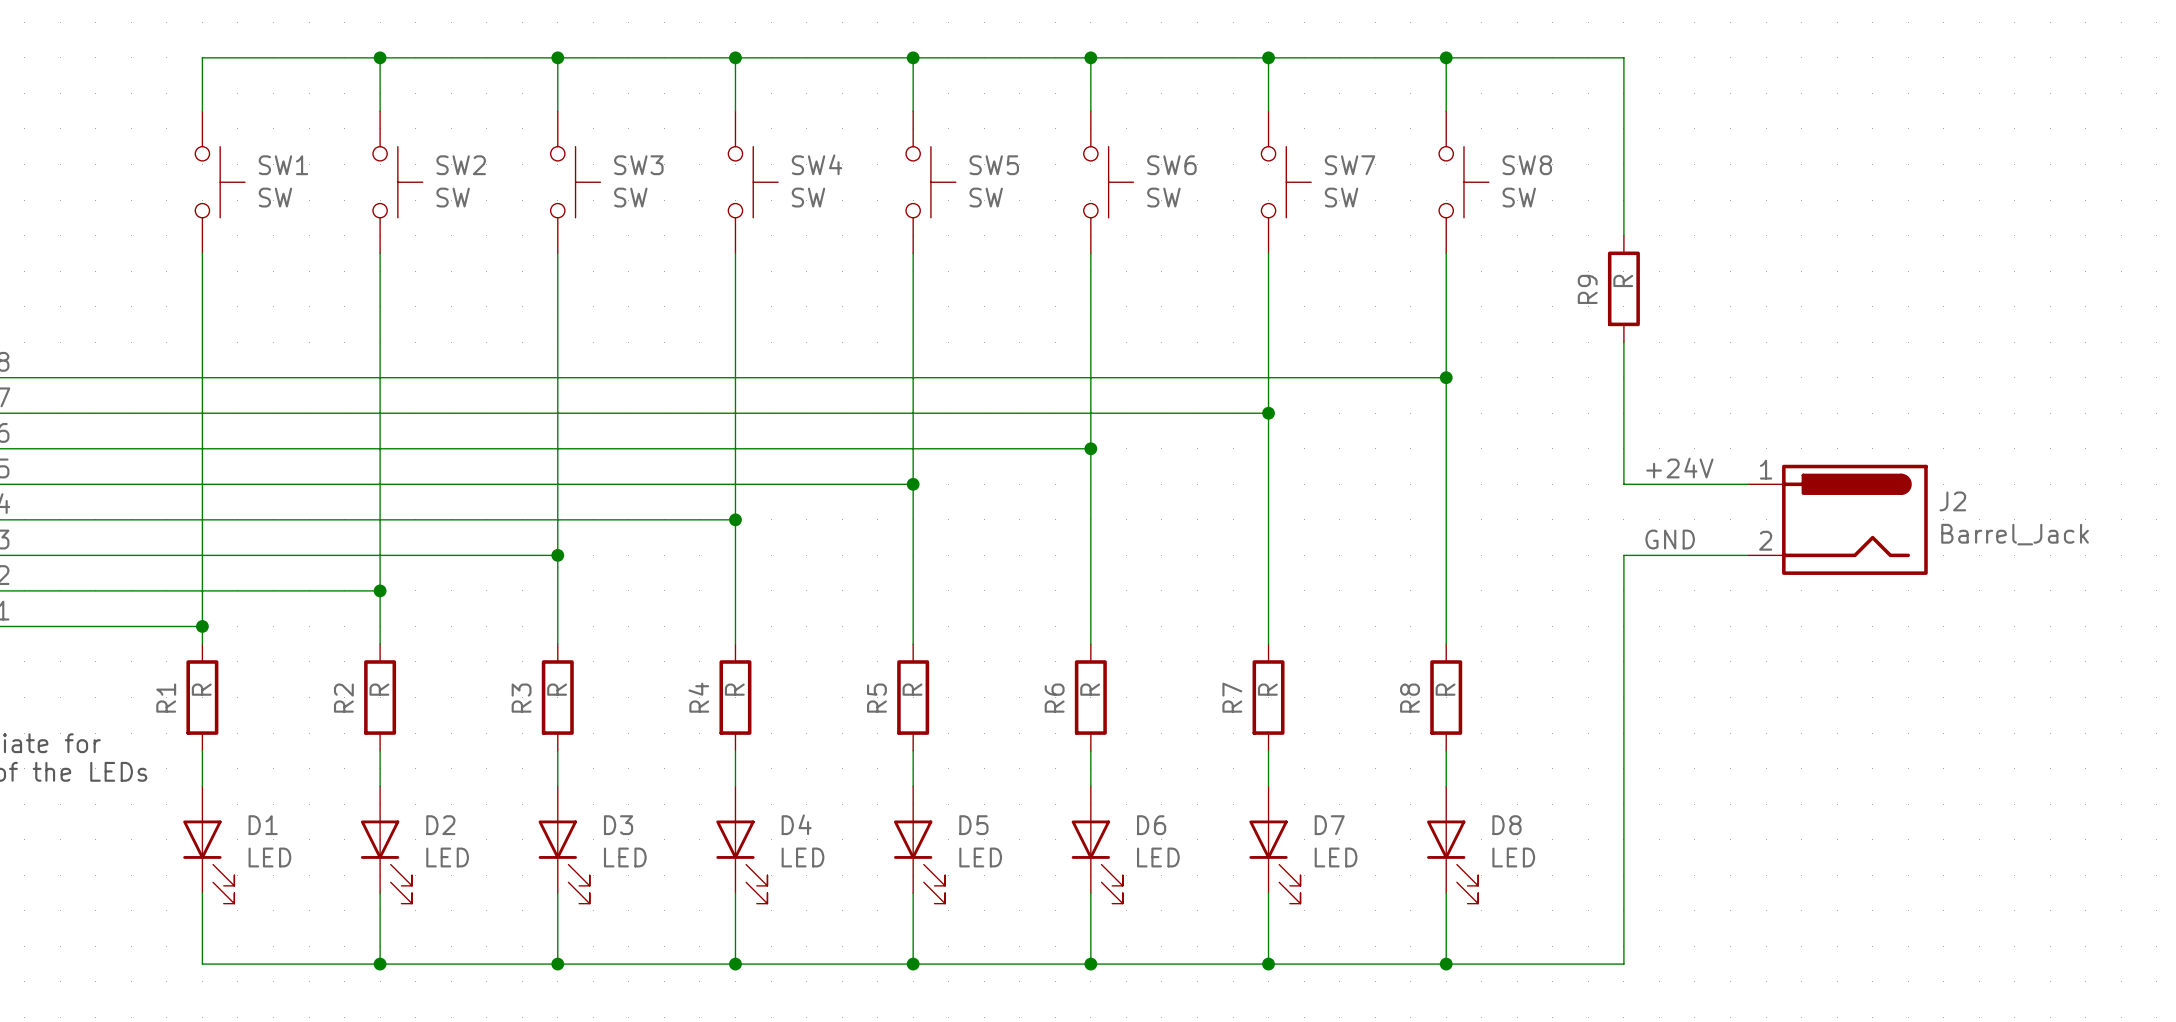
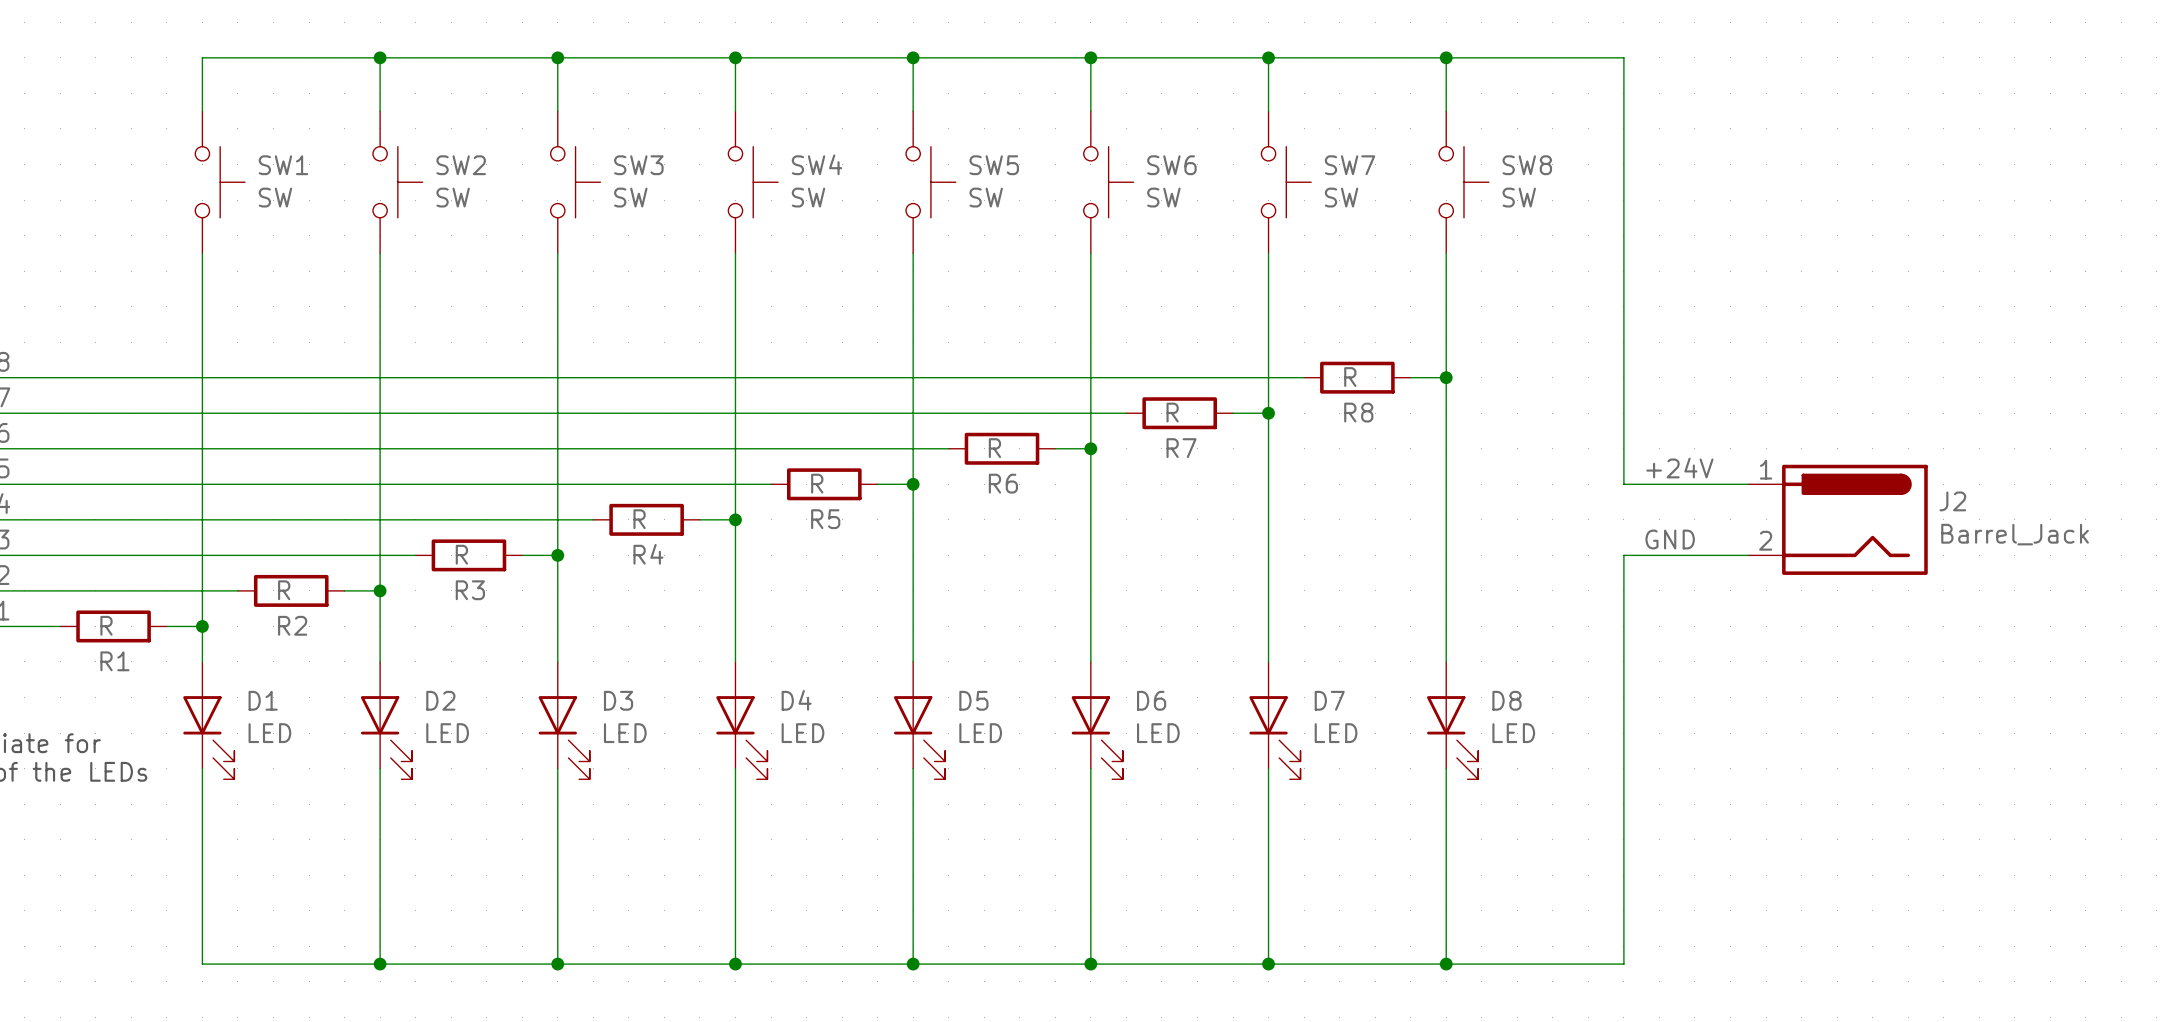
wire: none -> (1623, 235) (1623, 342)
R9: R (1623, 288) -> none
wire: (1304, 377) (1410, 377) -> none
wire: (1126, 413) (1233, 413) -> none
wire: (948, 448) (1055, 448) -> none
wire: (771, 484) (877, 484) -> none
wire: (593, 519) (699, 519) -> none
wire: (415, 555) (522, 555) -> none
wire: (237, 590) (344, 590) -> none
wire: (60, 626) (166, 626) -> none
R1 rotation: 0° (202, 697) -> 90° clockwise (113, 626)
R1 position: (202, 697) -> (113, 626)
R2 rotation: 0° (380, 697) -> 90° clockwise (291, 590)
R2 position: (380, 697) -> (291, 590)
R3 rotation: 0° (557, 697) -> 90° clockwise (468, 555)
R3 position: (557, 697) -> (468, 555)
R4 name position: R4 (698, 697) -> R4 (648, 554)
R4 rotation: 0° (735, 697) -> 90° clockwise (646, 519)
R4 position: (735, 697) -> (646, 519)
R5 rotation: 0° (913, 697) -> 90° clockwise (824, 484)
R5 position: (913, 697) -> (824, 484)
R6 rotation: 0° (1090, 697) -> 90° clockwise (1002, 448)
R6 position: (1090, 697) -> (1002, 448)
R7 name position: R7 (1232, 697) -> R7 (1181, 448)
R7 rotation: 0° (1268, 697) -> 90° clockwise (1179, 413)
R7 position: (1268, 697) -> (1179, 413)
R8 rotation: 0° (1446, 697) -> 90° clockwise (1357, 377)
R8 position: (1446, 697) -> (1357, 377)
R1 name position: R1 (166, 698) -> R1 (114, 661)
R2 name position: R2 (343, 698) -> R2 (292, 625)
R3 name position: R3 (521, 698) -> R3 (470, 590)
R5 name position: R5 (876, 698) -> R5 (825, 519)
R6 name position: R6 (1054, 698) -> R6 (1003, 483)
R8 name position: R8 (1410, 698) -> R8 (1358, 412)
D1 position: (208, 845) -> (208, 720)
D2 position: (386, 845) -> (386, 720)
D3 position: (564, 845) -> (564, 720)
D4 position: (741, 845) -> (741, 720)
D5 position: (919, 845) -> (919, 720)
D6 position: (1097, 845) -> (1097, 720)
D7 position: (1274, 845) -> (1274, 720)
D8 position: (1452, 845) -> (1452, 720)

